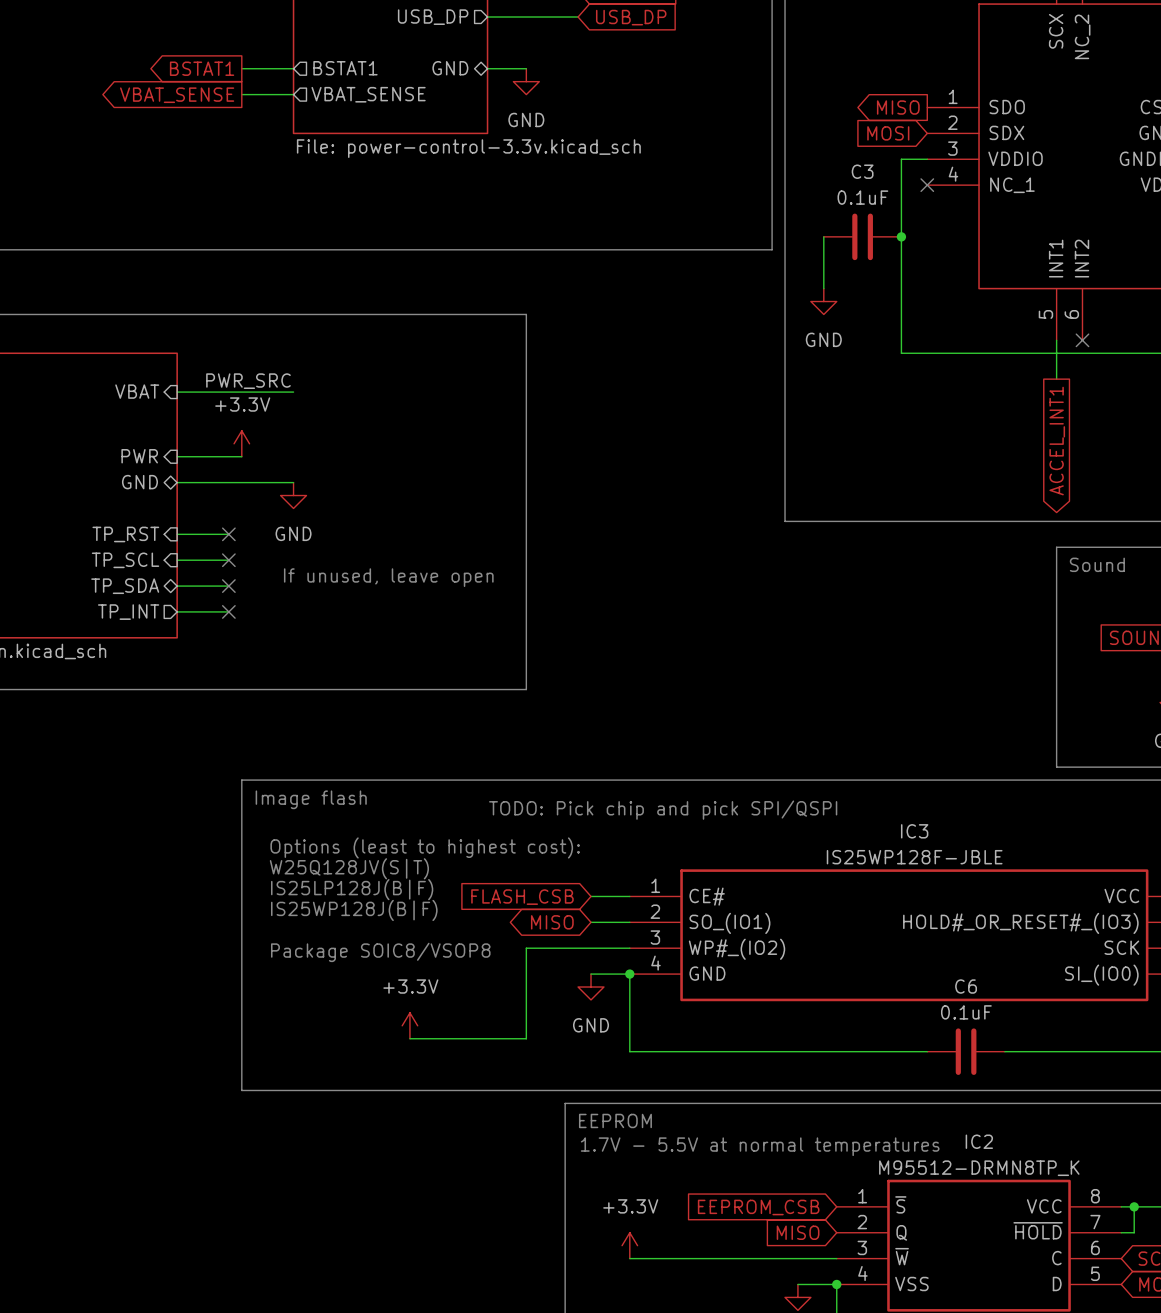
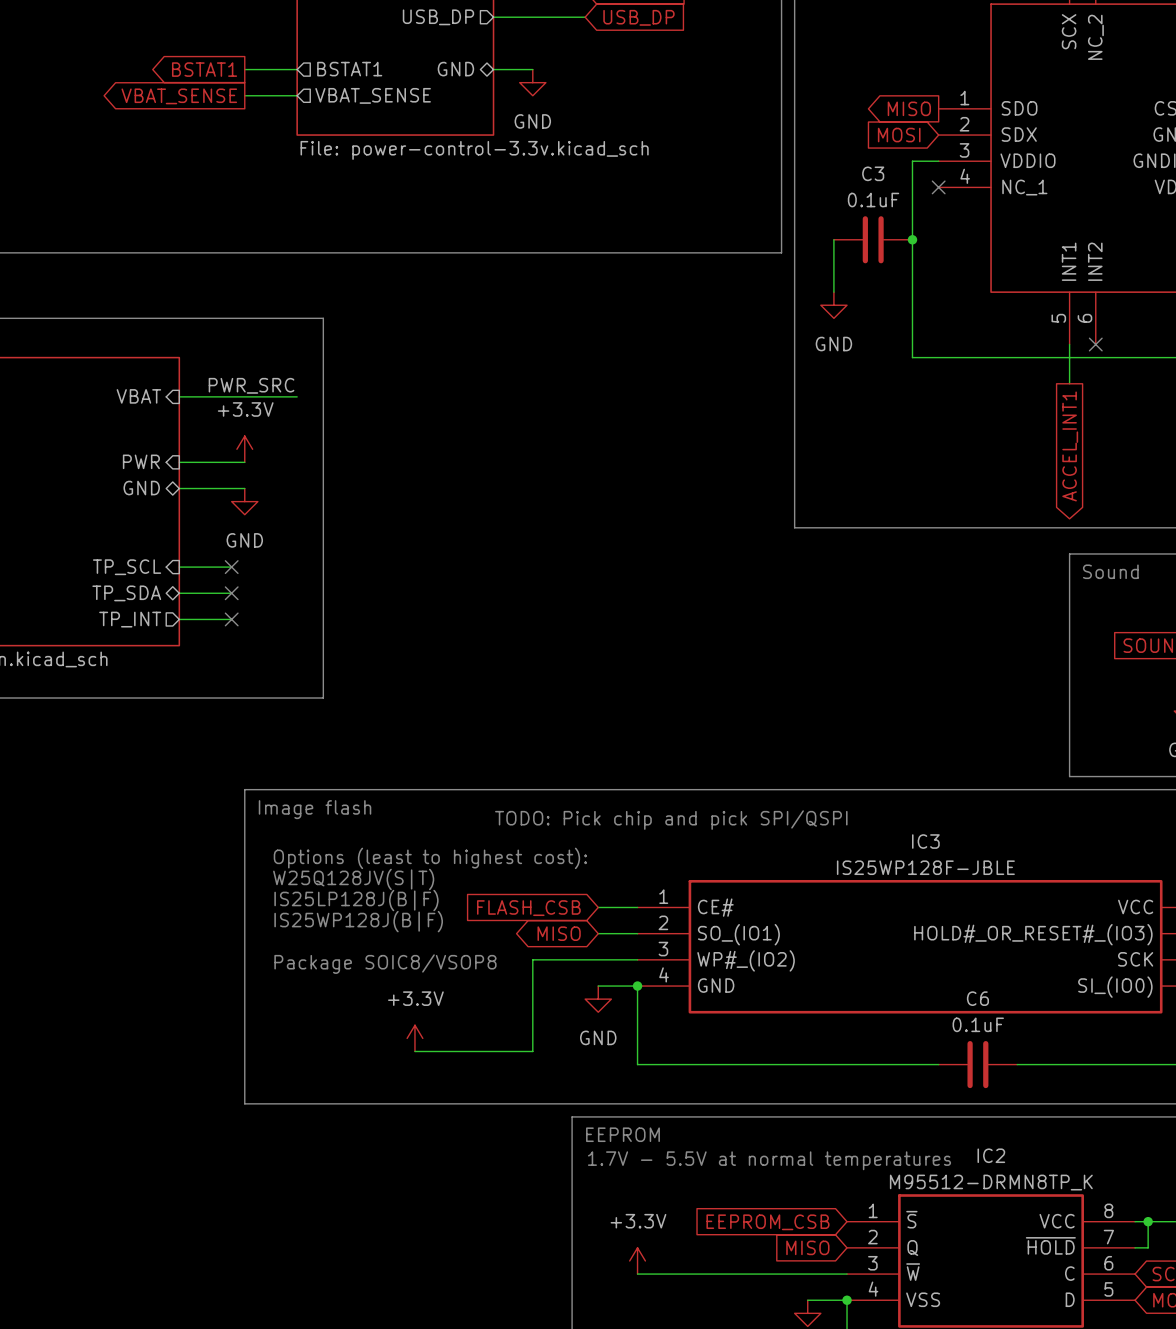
line: (319, 314) (526, 314) (526, 689) (319, 689) -> (323, 318) (323, 698)
wire: (241, 482) (293, 482) -> none
power symbol position: GND (293, 495) -> GND (244, 501)
sheet pin: TP_RST (125, 534) -> none
wire: (177, 534) (228, 534) -> none
no-connect mark: (228, 534) -> none
text: If unused, leave open (388, 577) -> none

